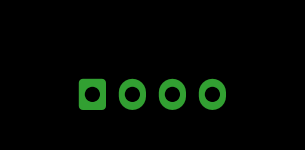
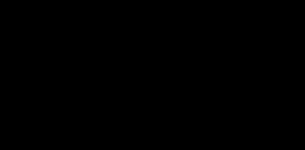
part: (152, 94) -> none

